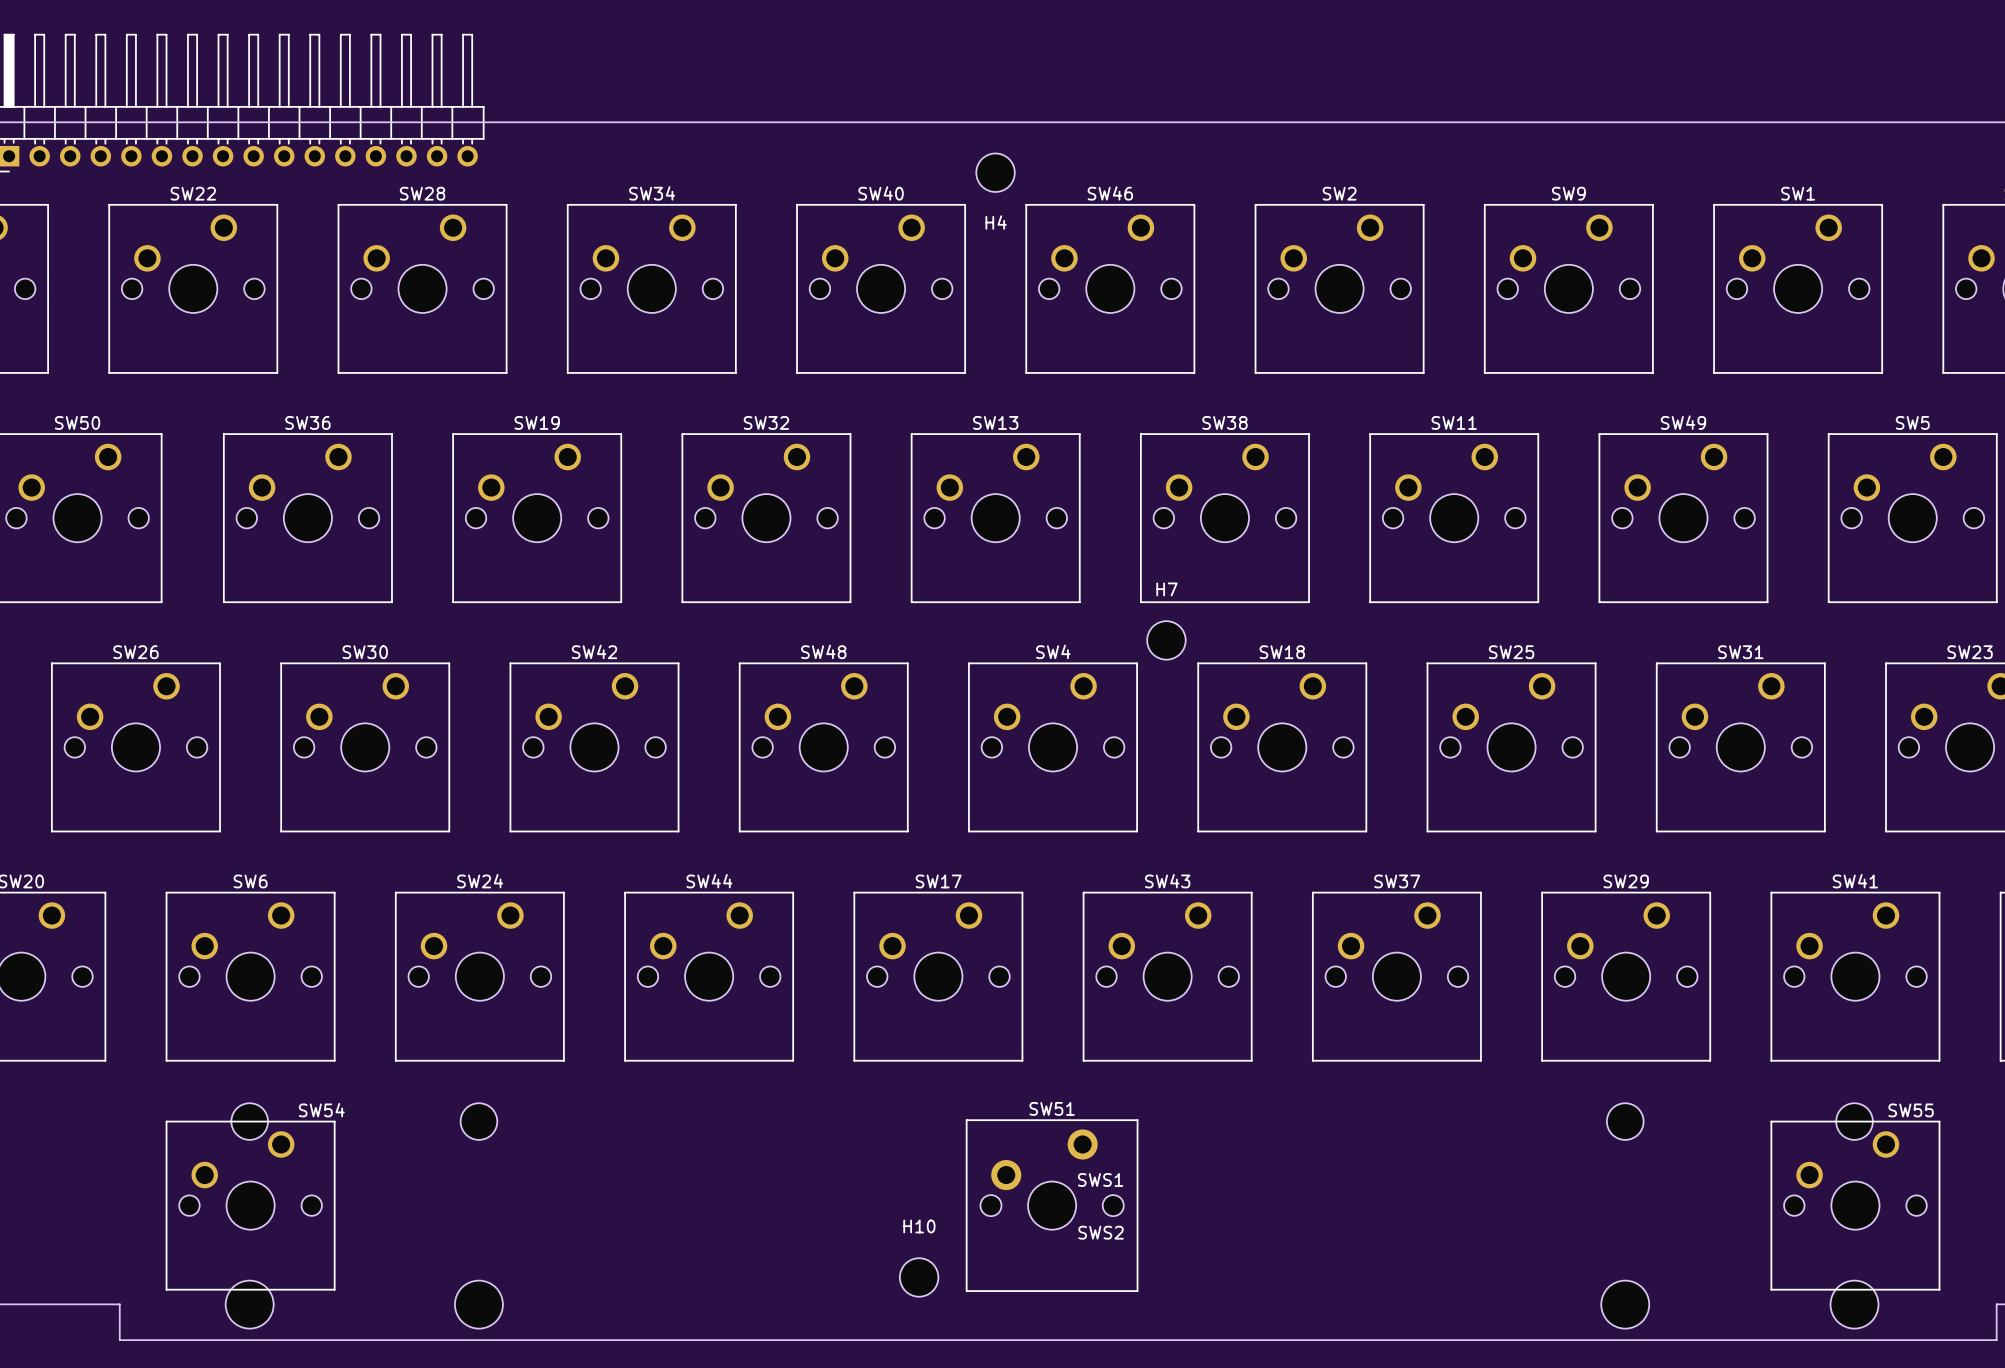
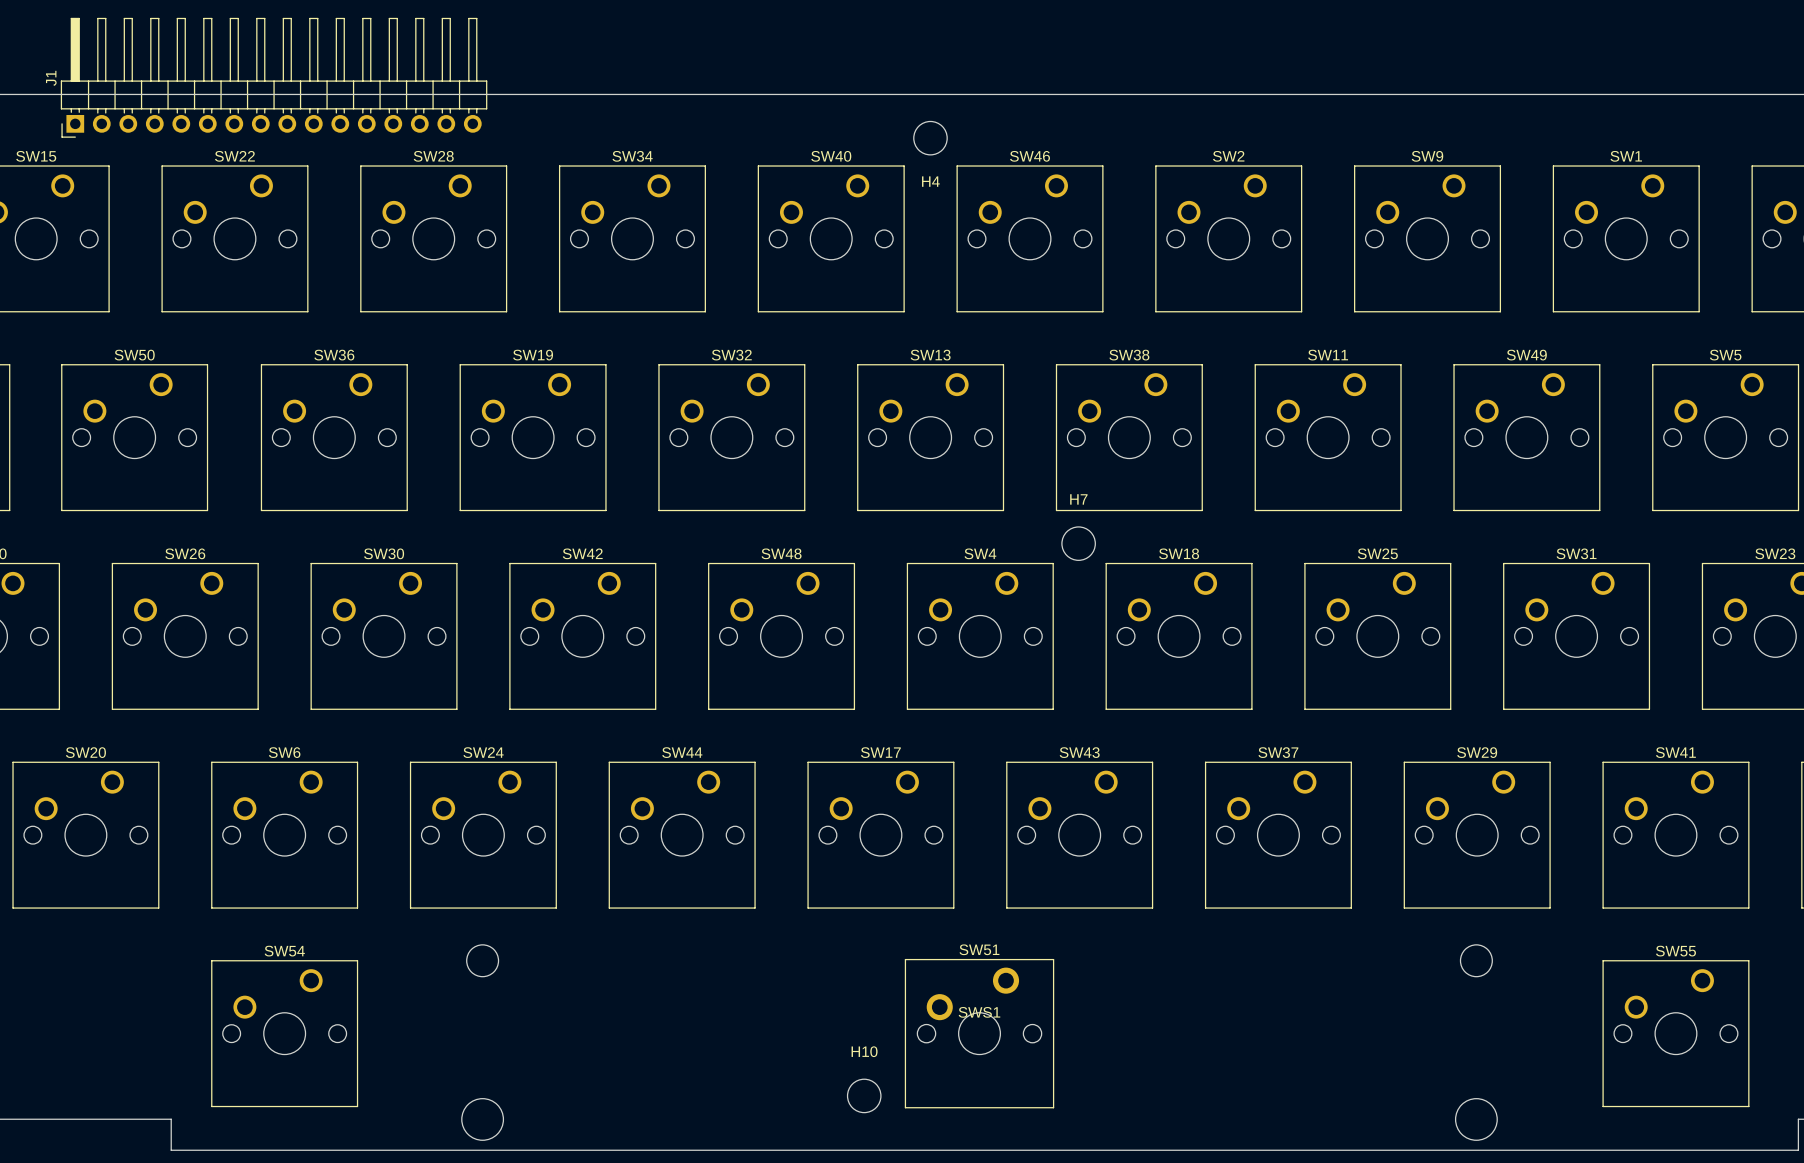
SW54 name position: SW54 (321, 1110) -> SW54 (284, 951)
SW55 name position: SW55 (1911, 1110) -> SW55 (1675, 951)
SWS1 name position: SWS1 (1100, 1179) -> SWS1 (979, 1012)
SWS2: (1052, 1215) -> none

